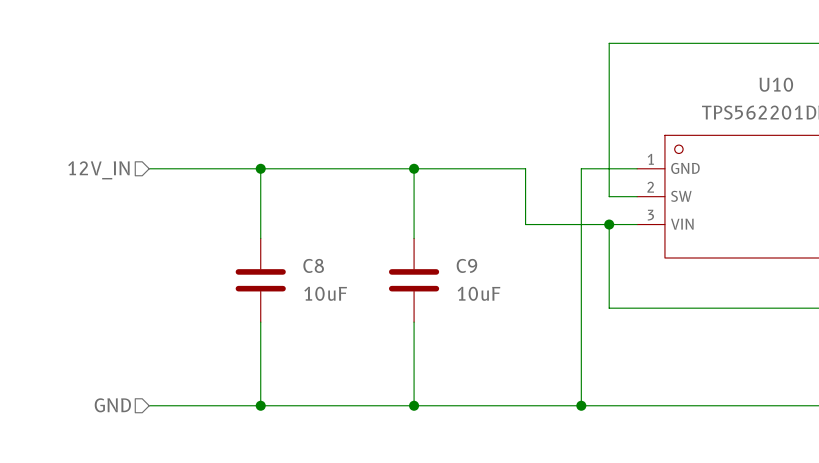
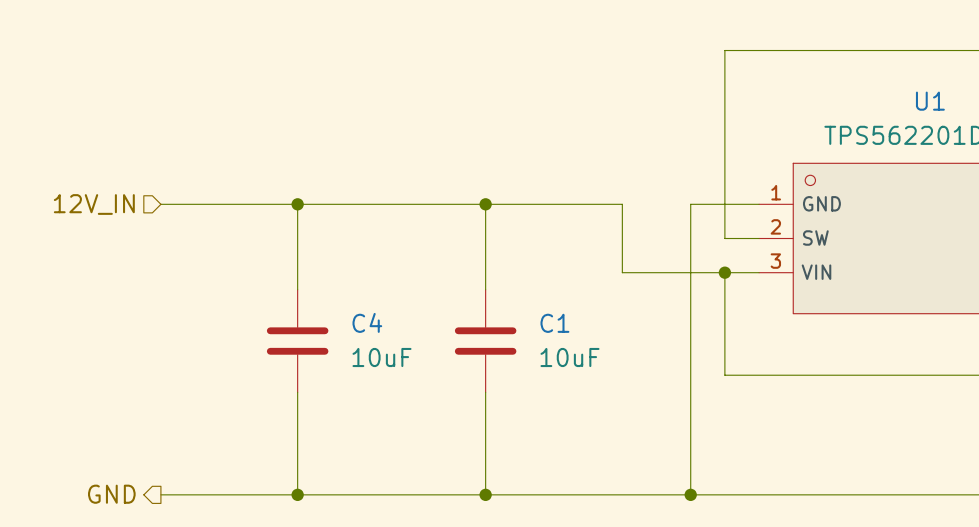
U10 name: U10 (776, 84) -> U1 (930, 101)
C8 name: C8 (313, 265) -> C4 (367, 322)
C9 name: C9 (466, 265) -> C1 (554, 323)
hierarchical label shape: input (112, 405) -> output (111, 494)

